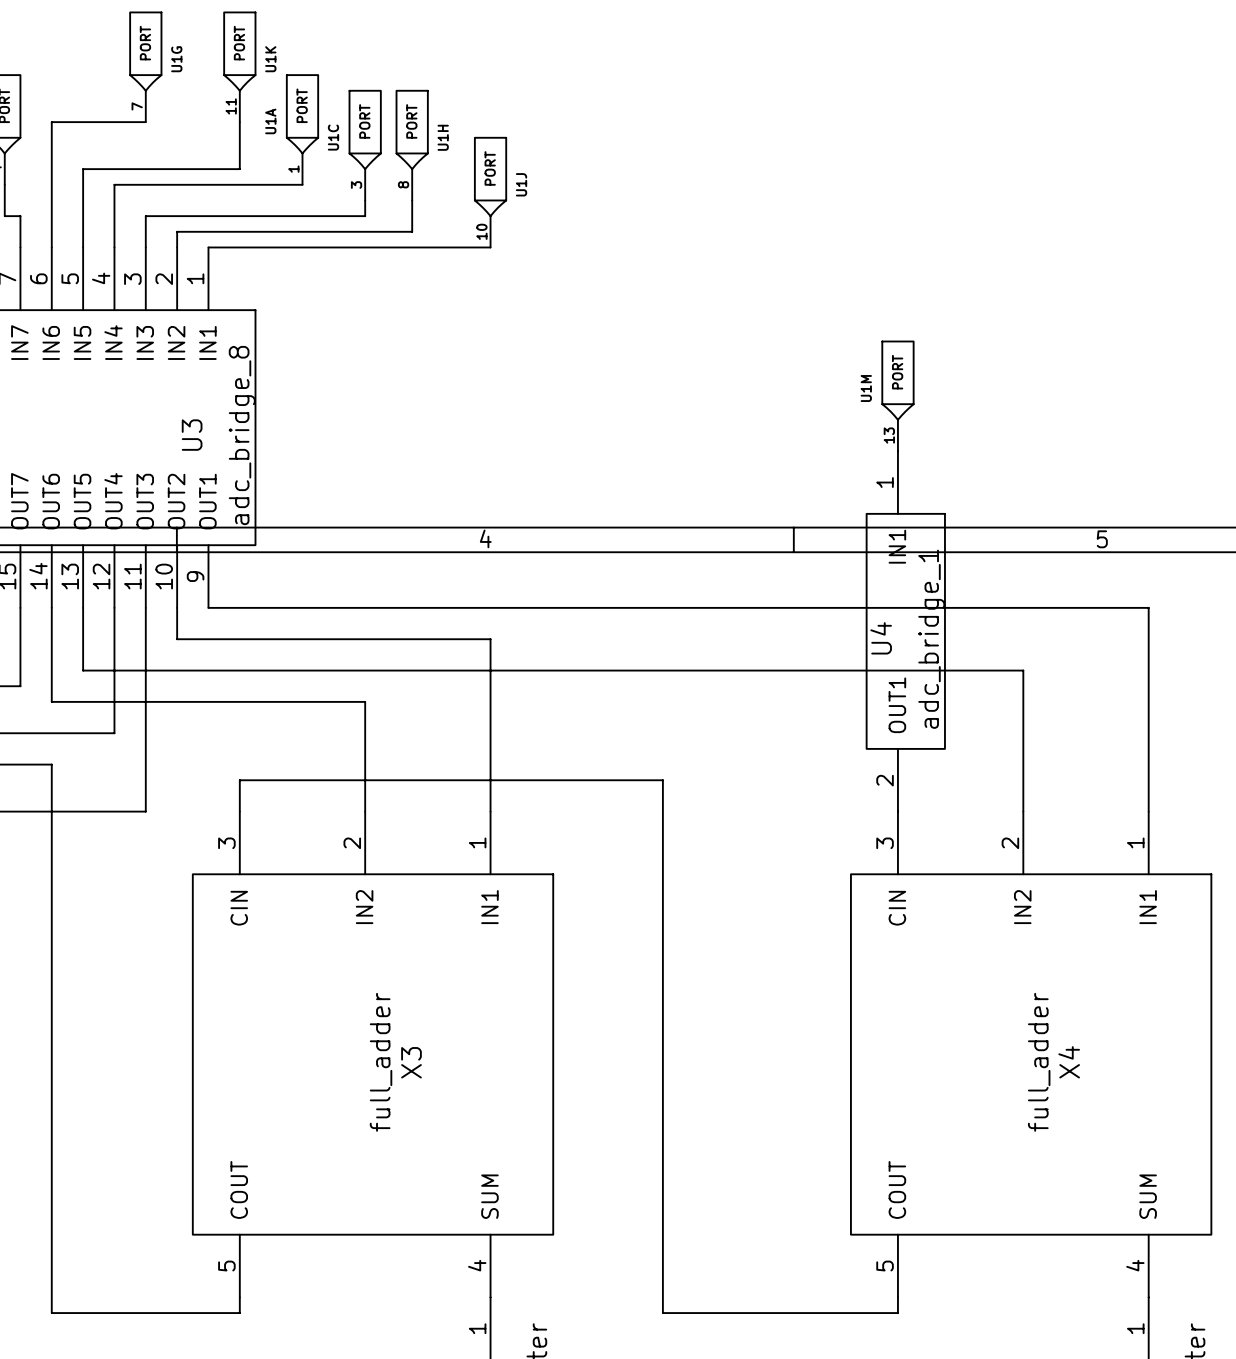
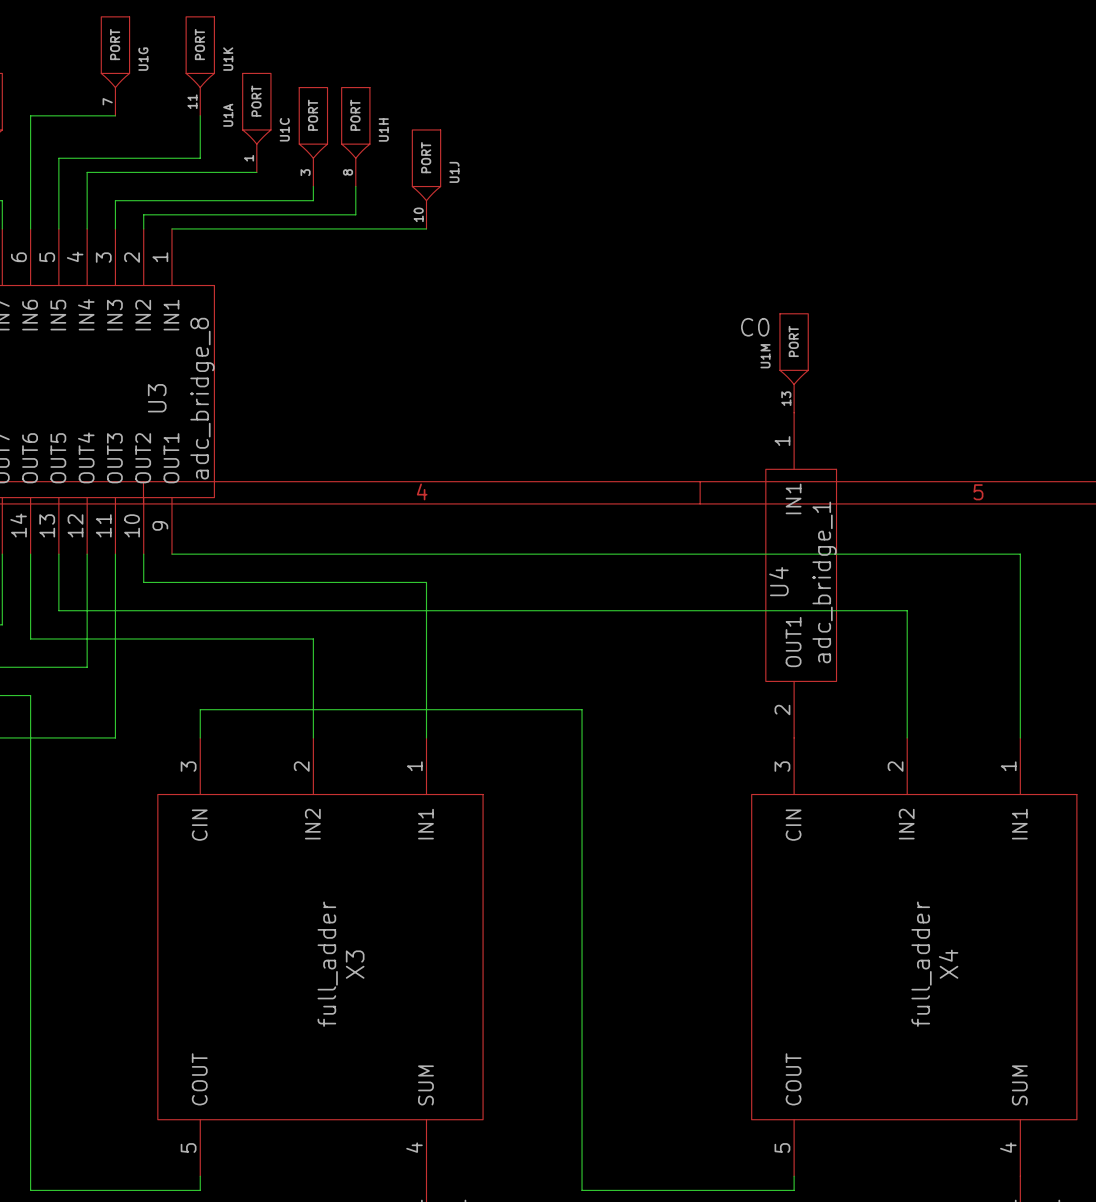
label: none -> C0 (755, 327)

